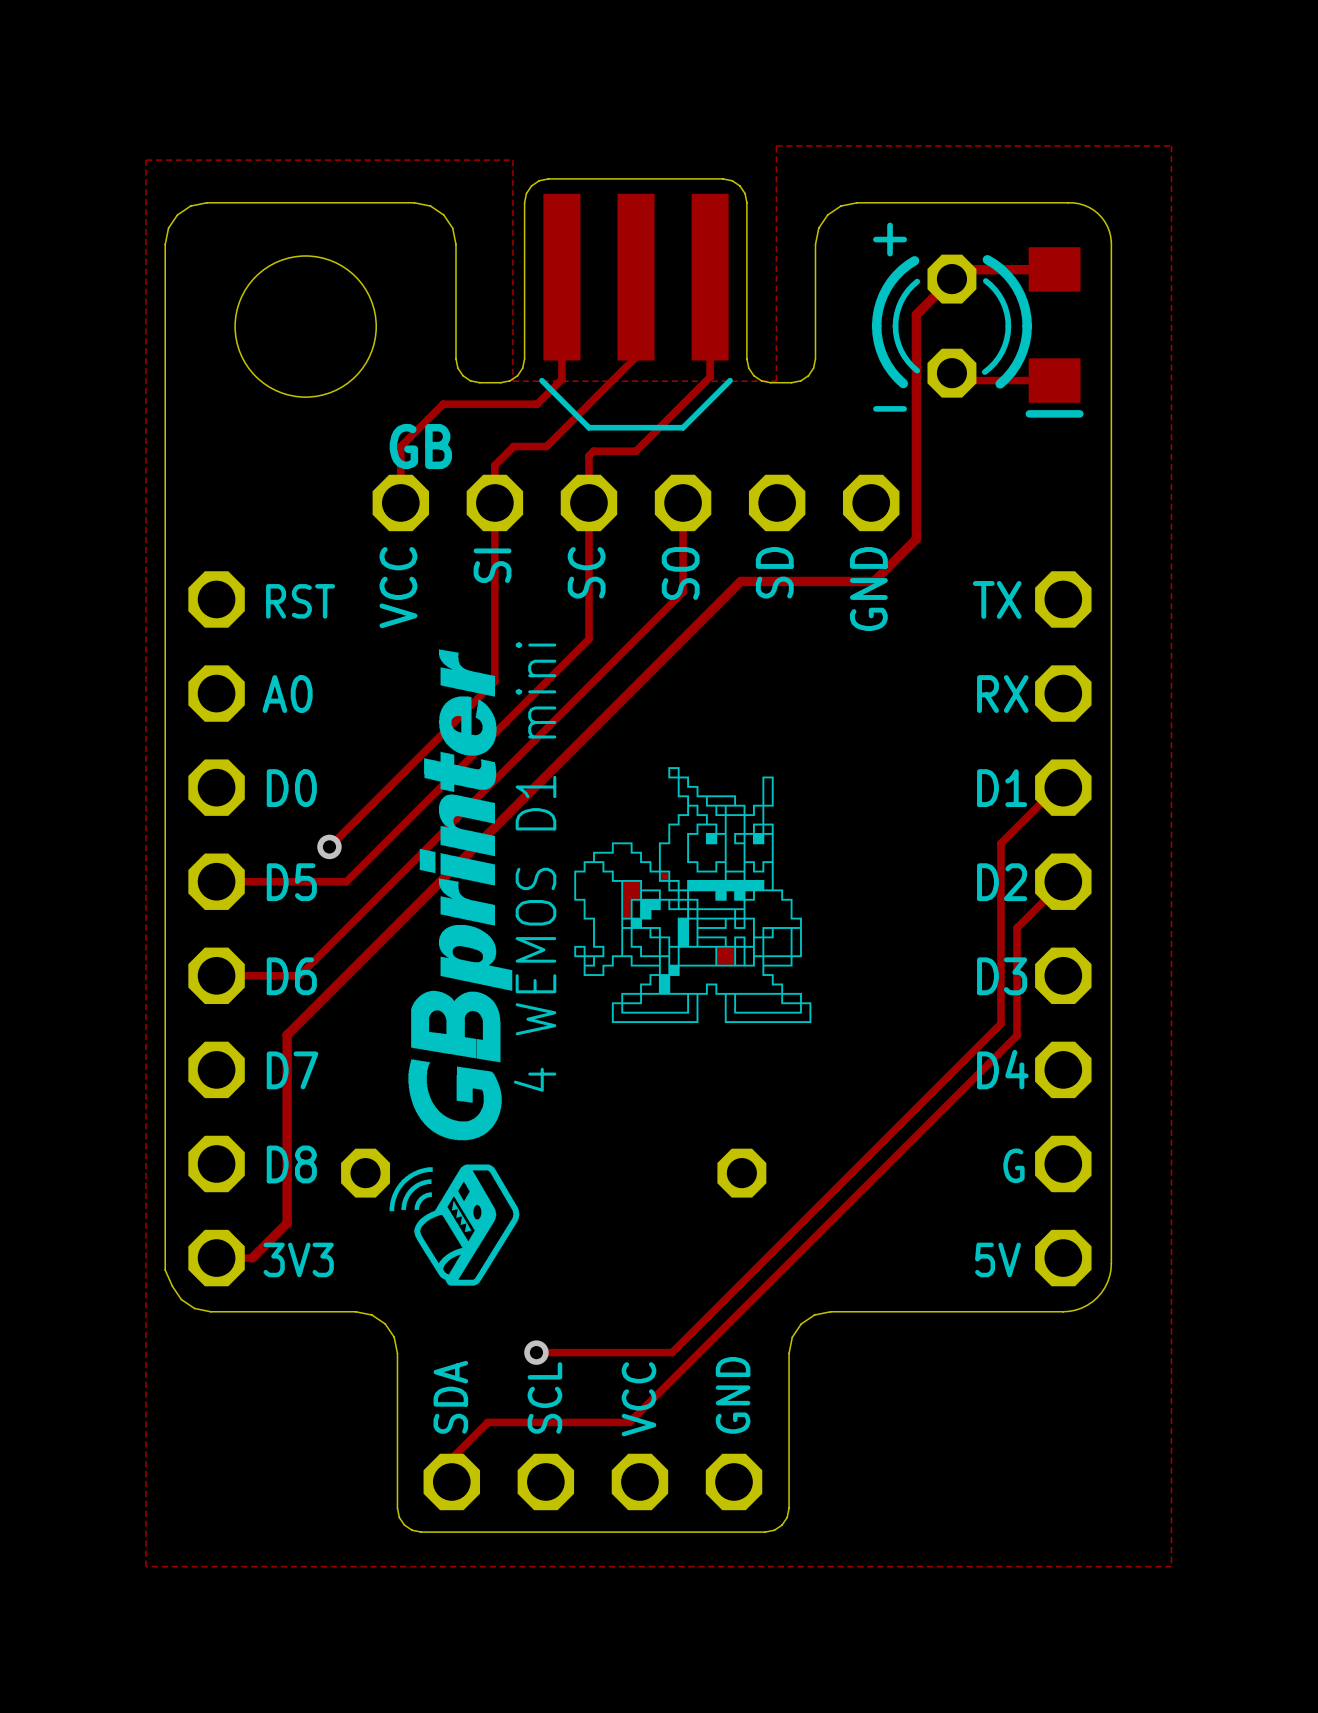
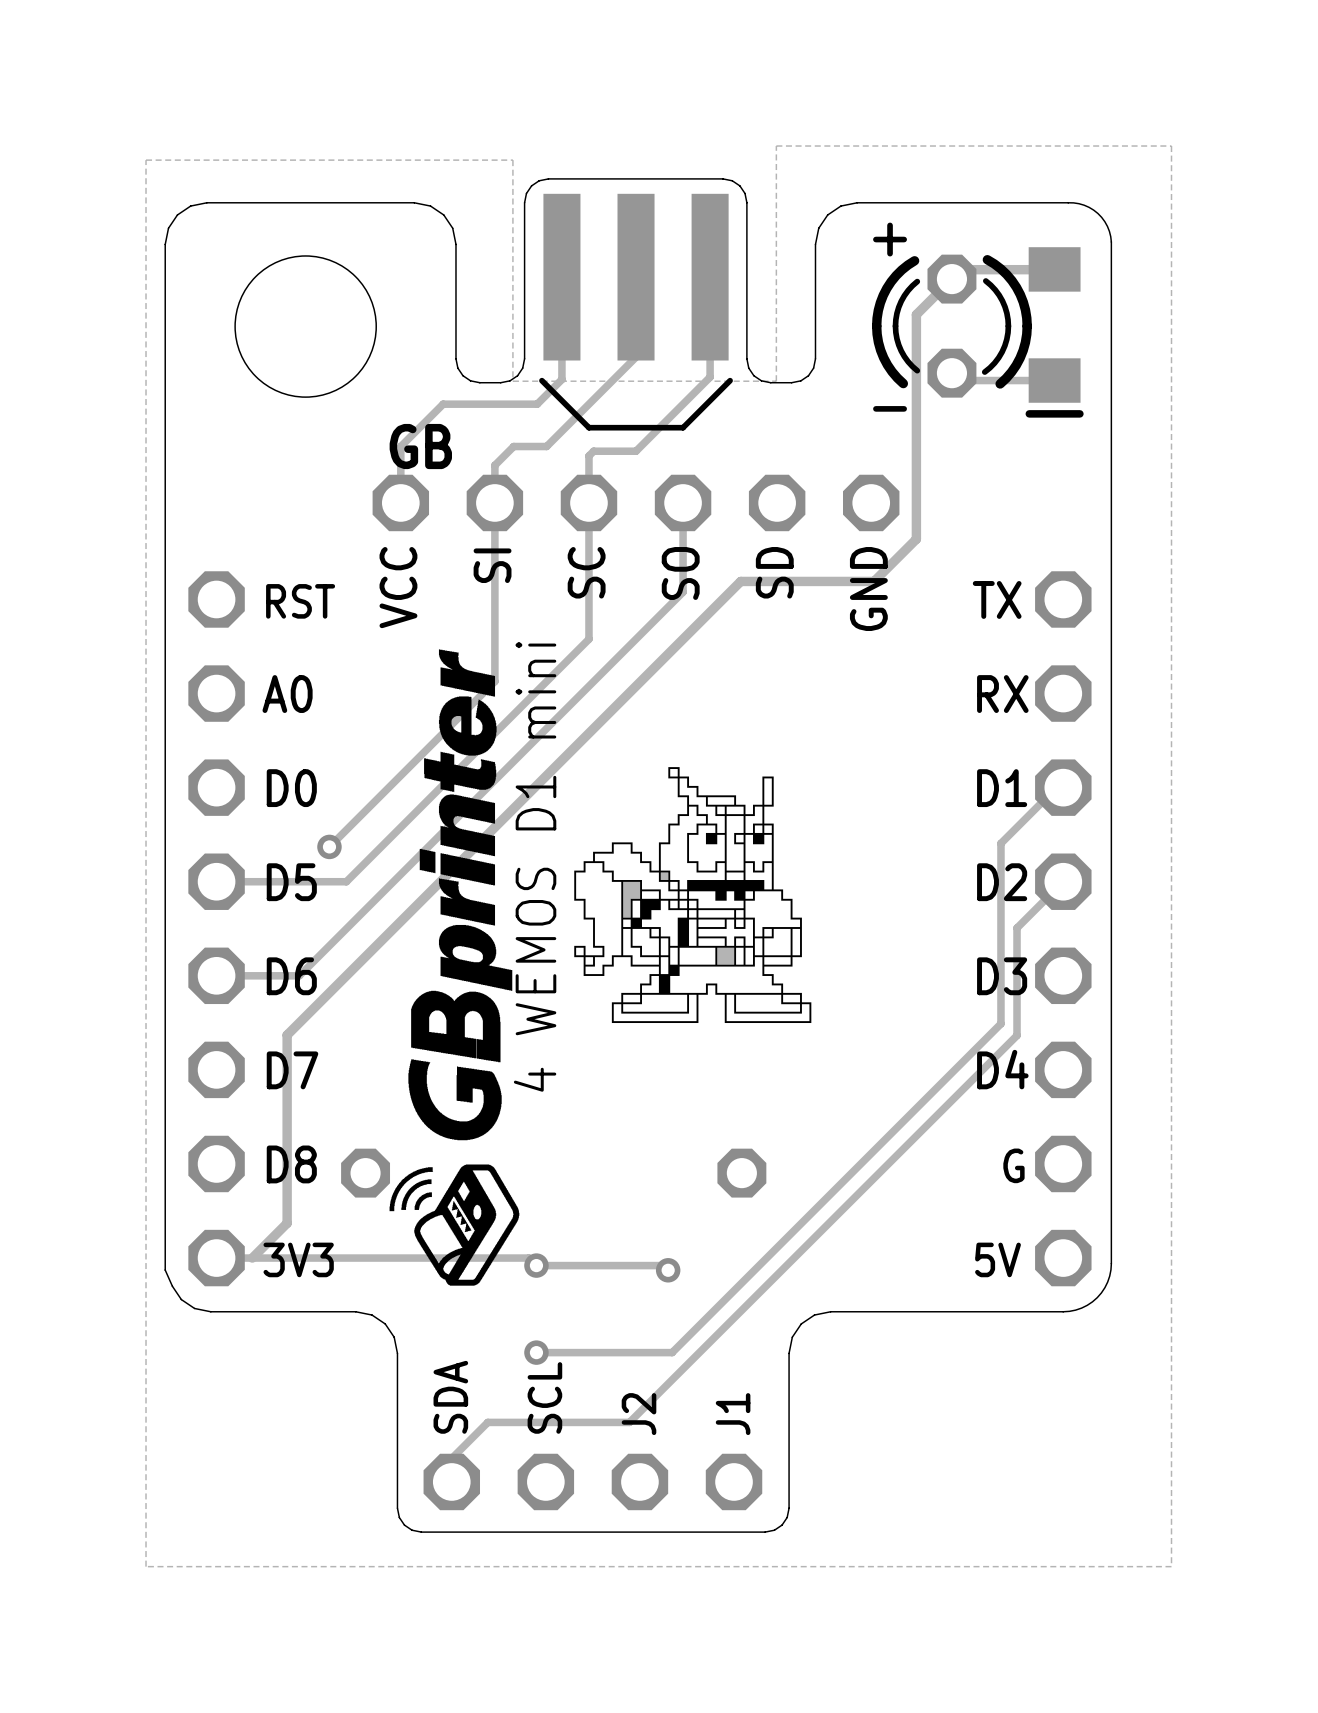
track: none -> (252, 1258) (528, 1258) (536, 1265) (663, 1265) (668, 1270)
via: none -> (536, 1265)
via: none -> (668, 1270)
text: GND (733, 1395) -> J1 (733, 1414)
text: VCC (639, 1399) -> J2 (639, 1414)

